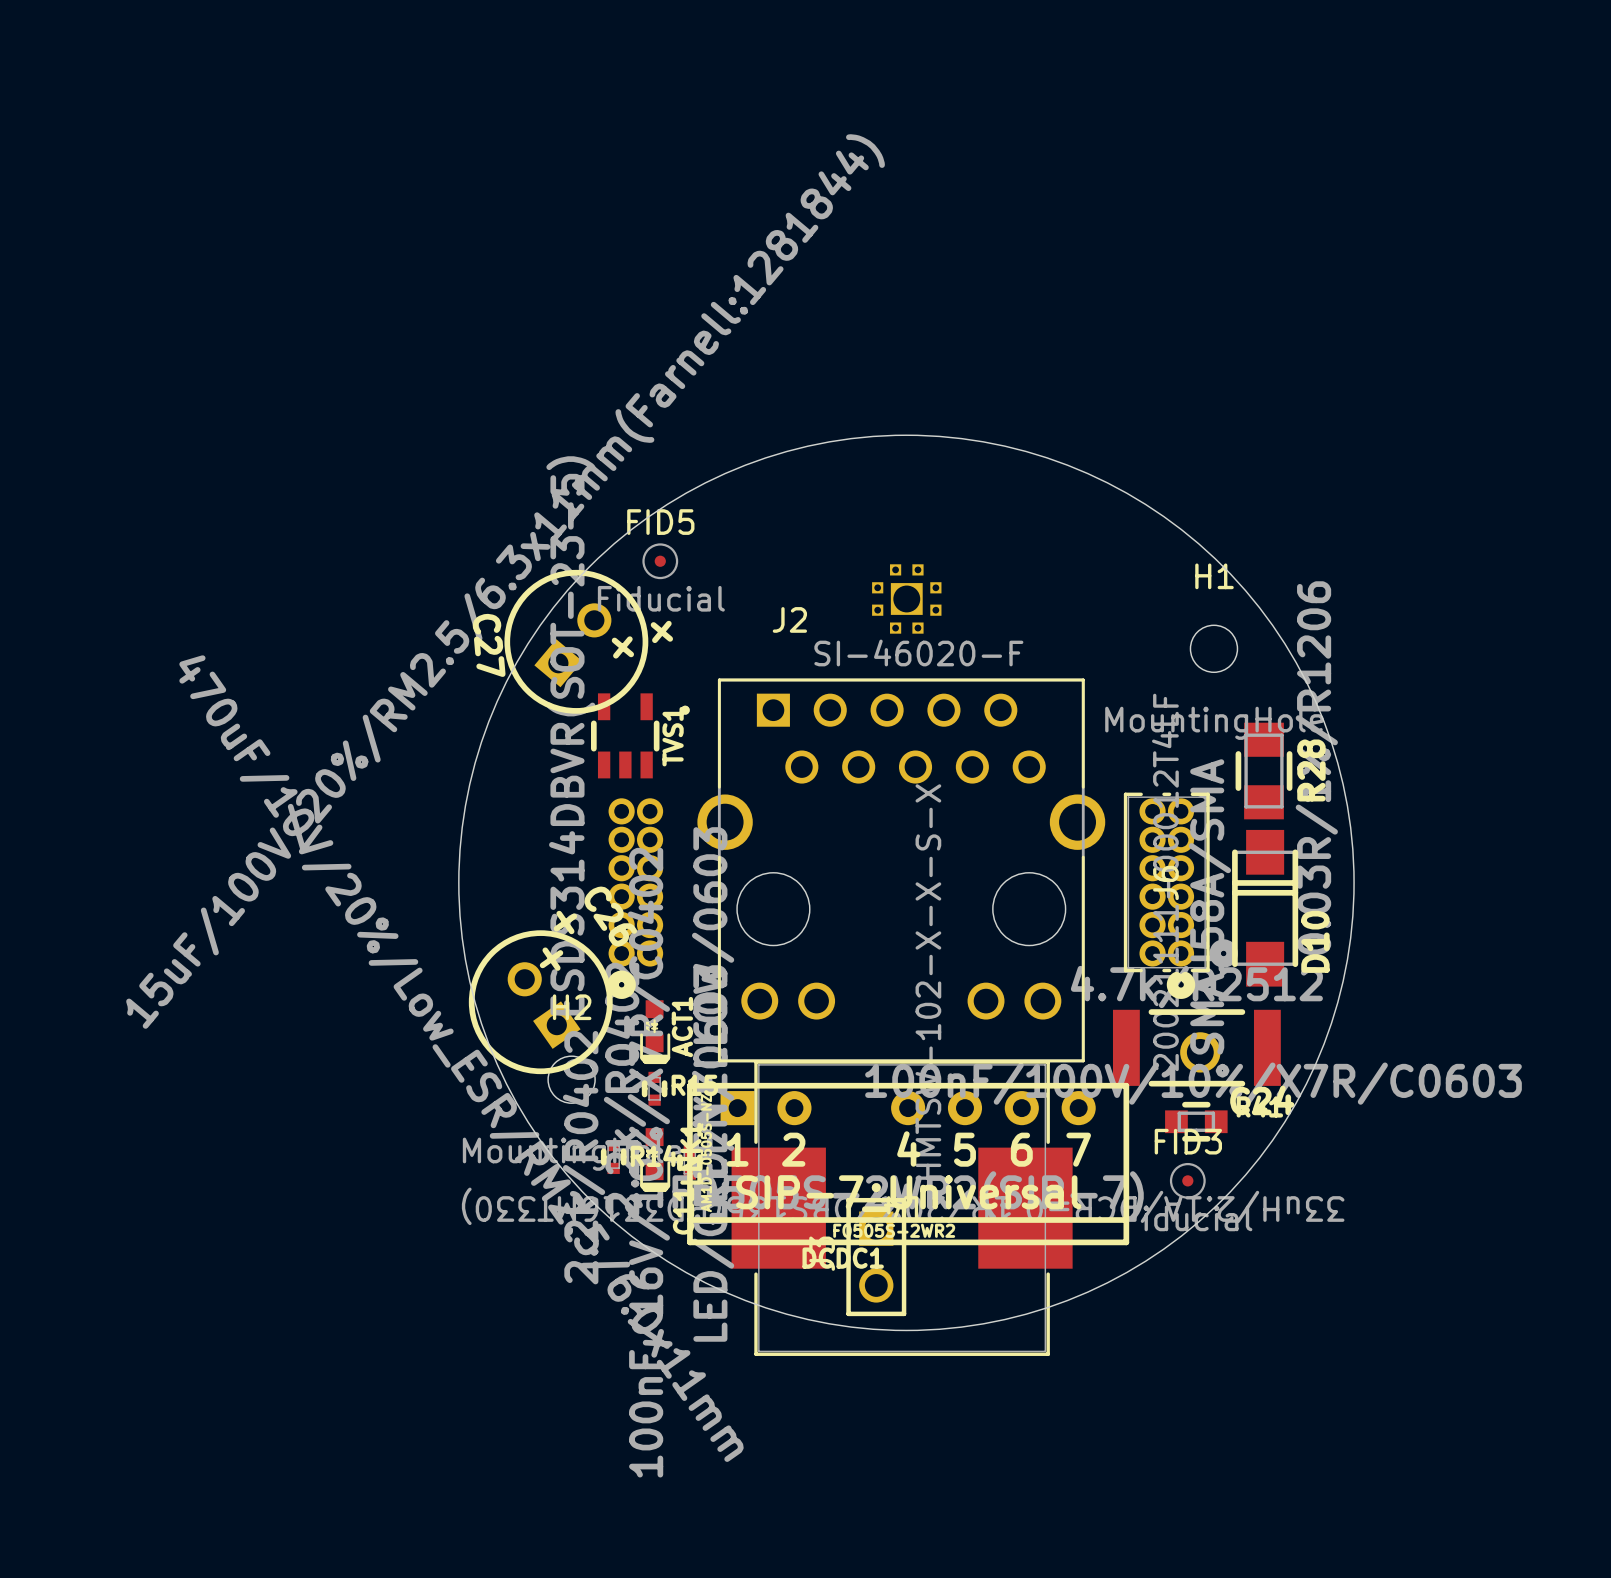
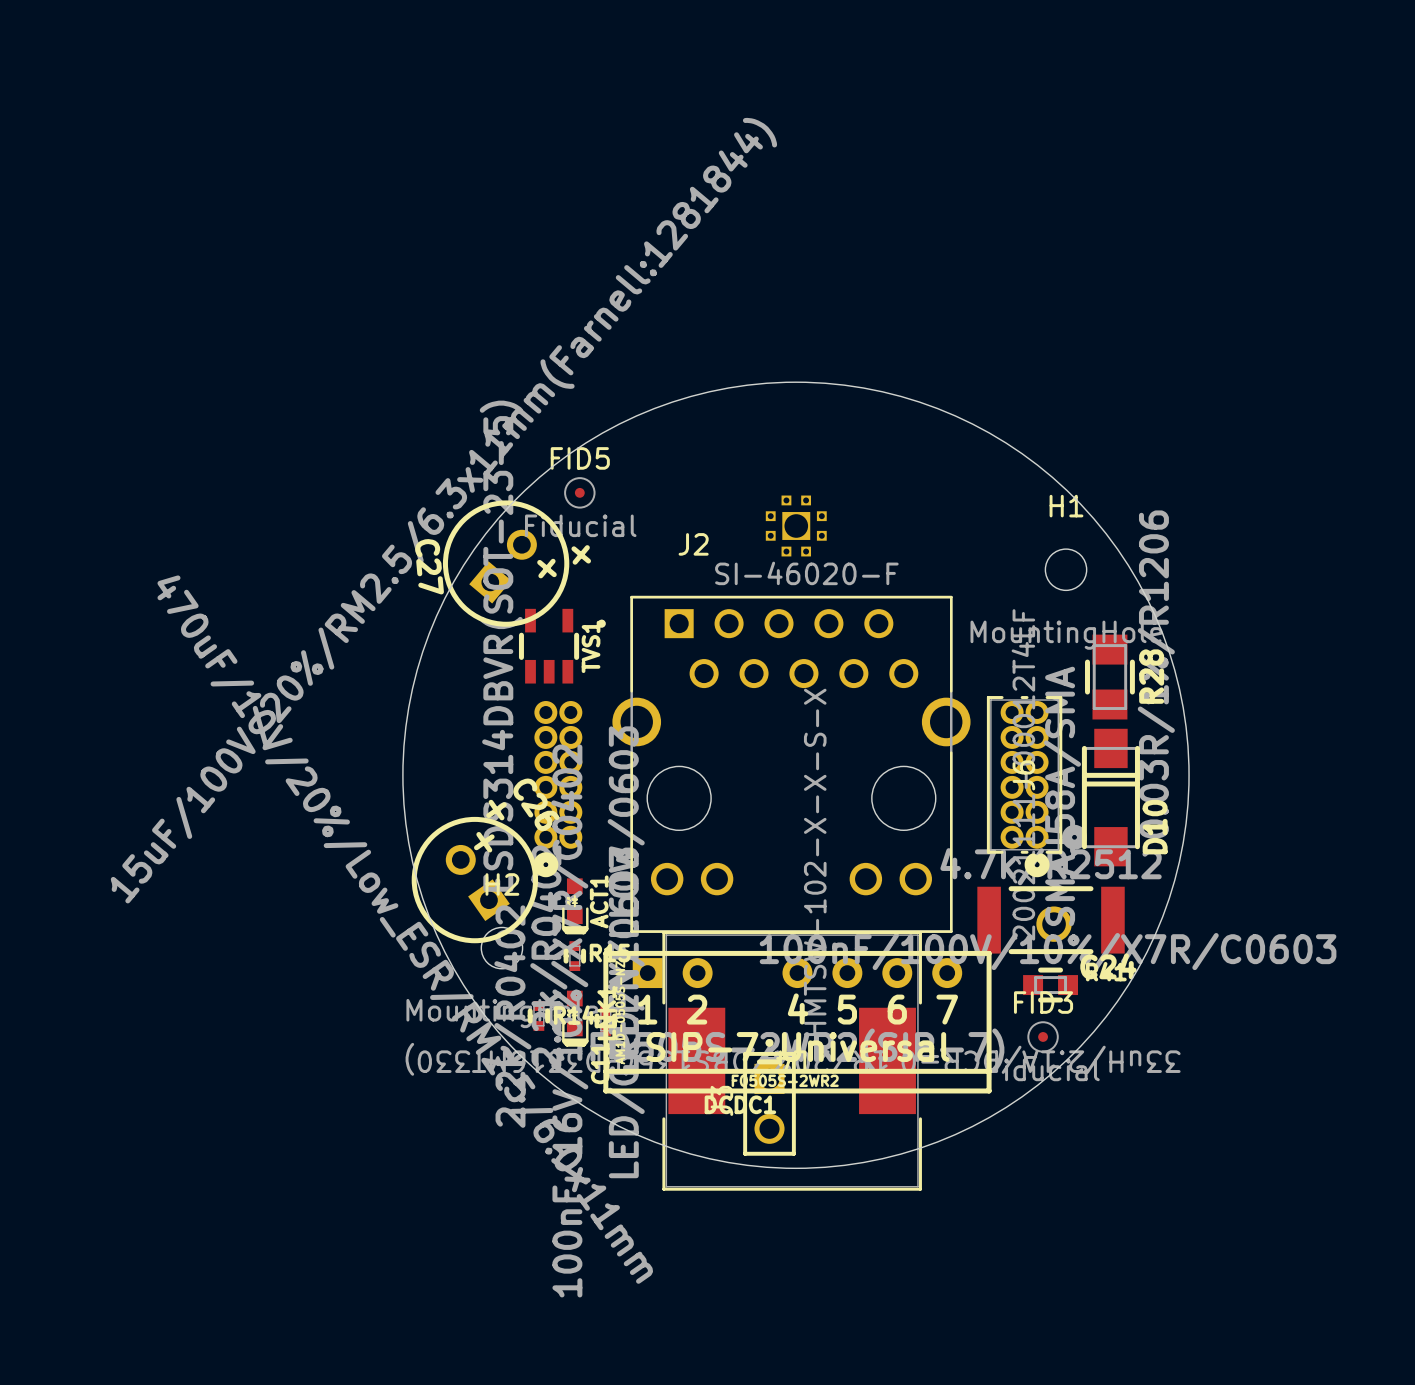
part footprint: [731, 1060, 1073, 1356] -> [662, 931, 922, 1191]

